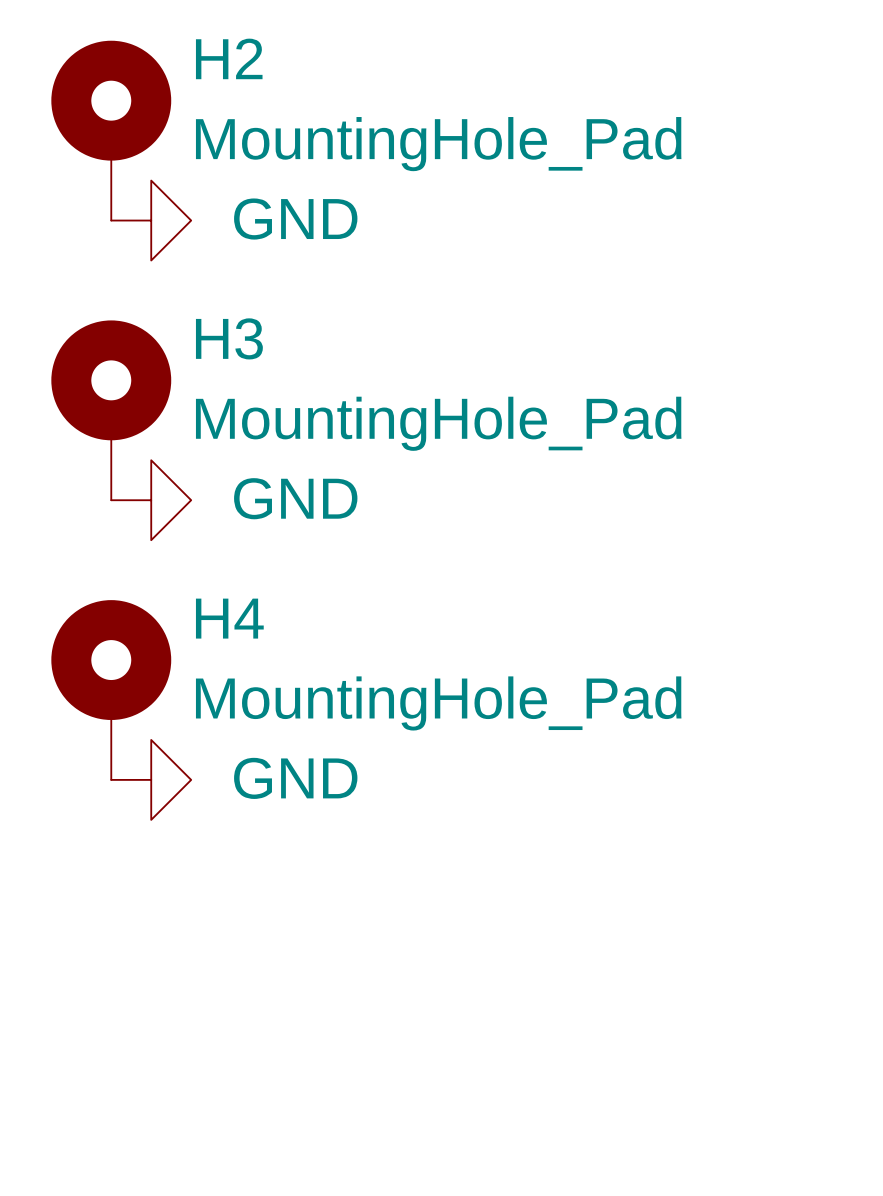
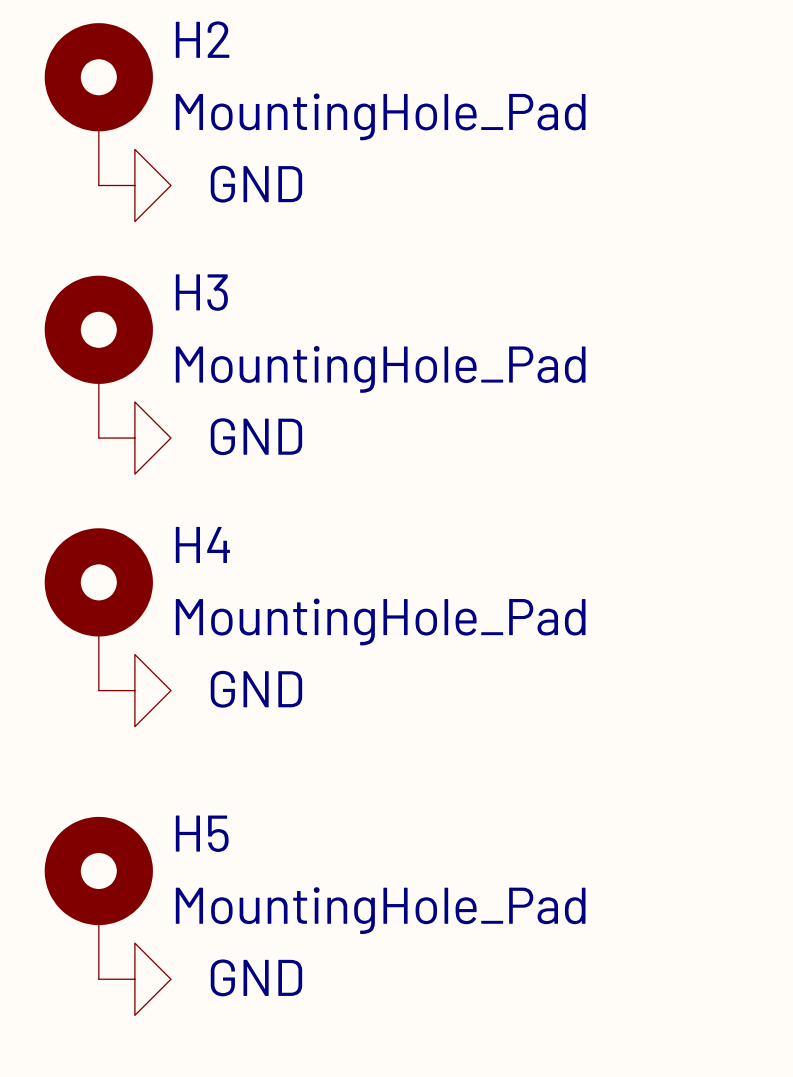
H5: none -> MountingHole_Pad (98, 898)
power symbol: none -> GND (134, 979)

